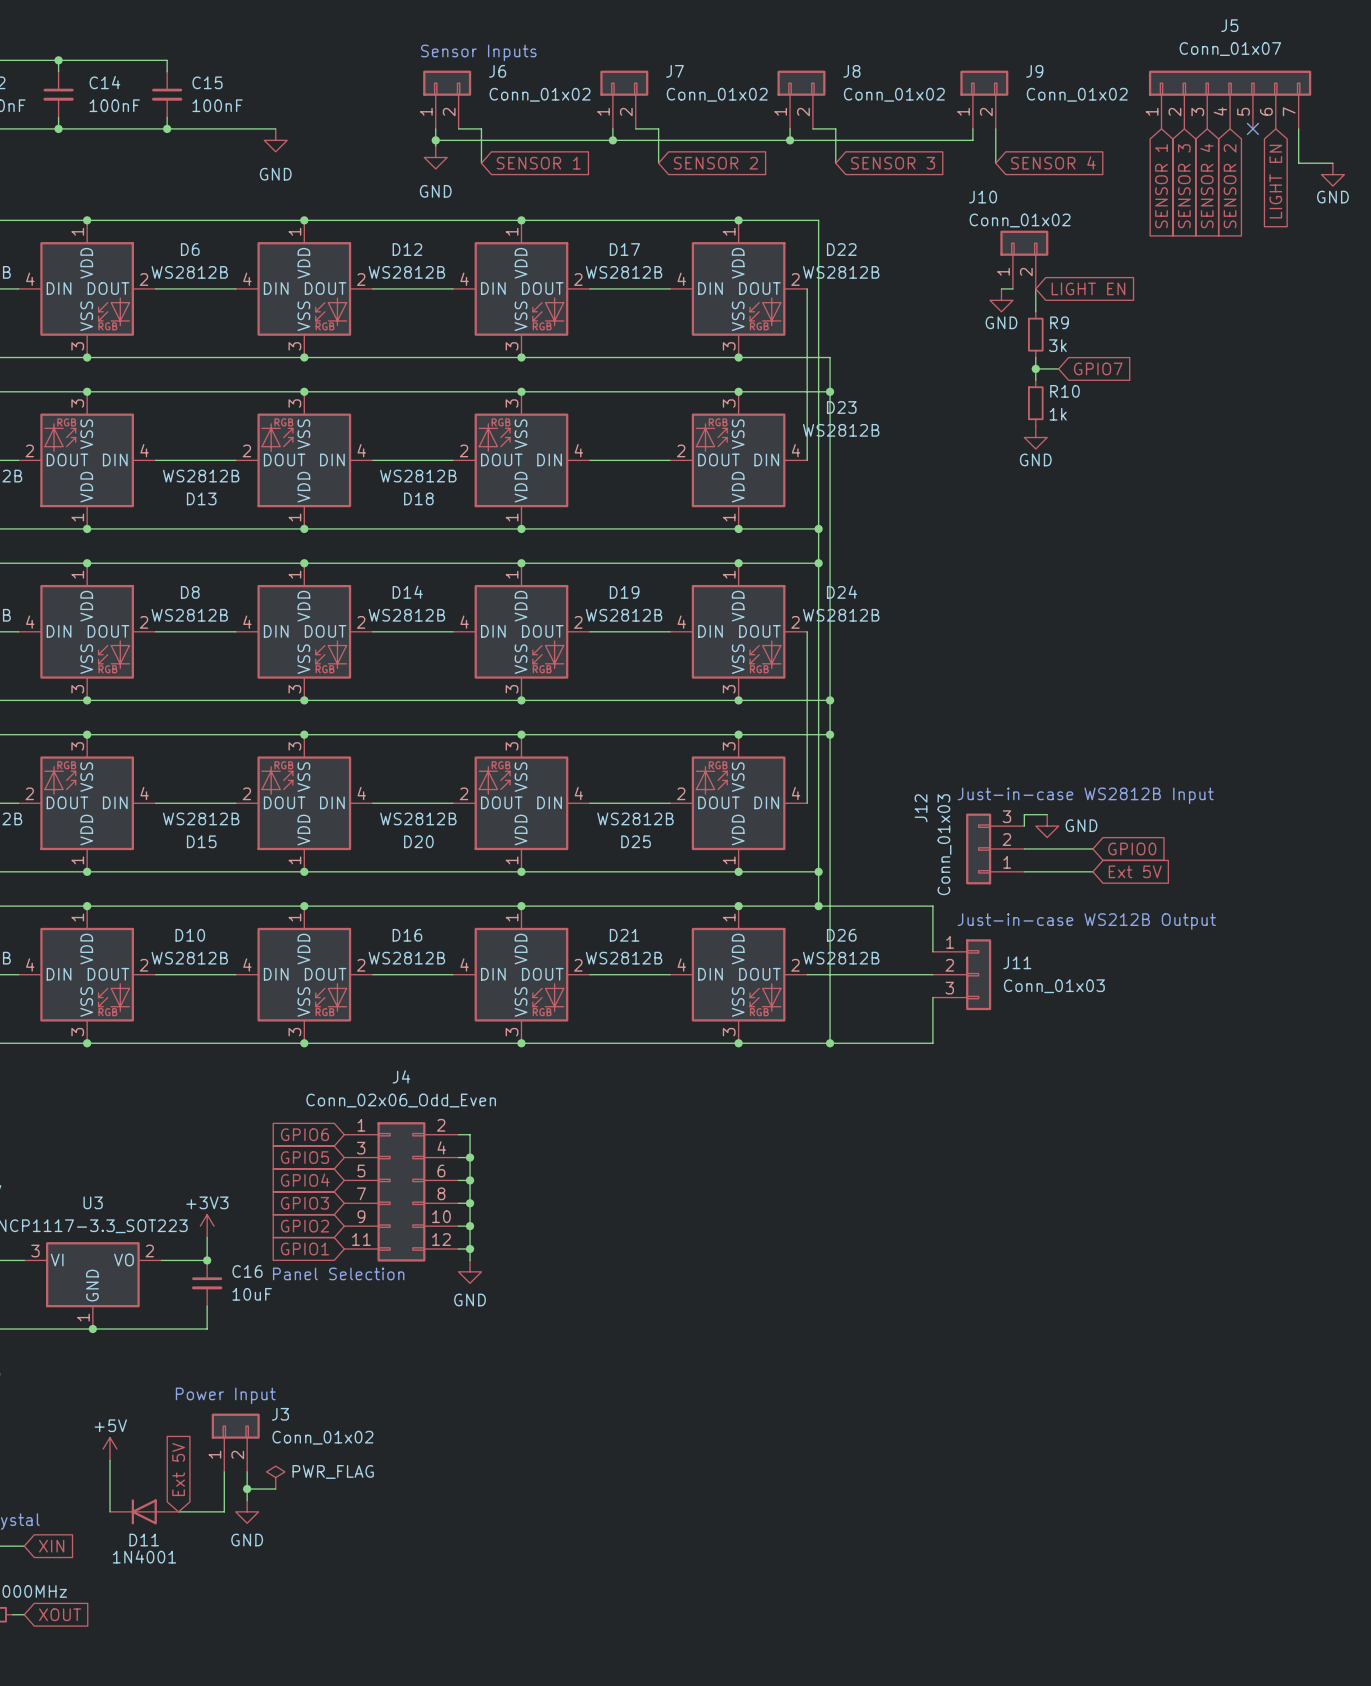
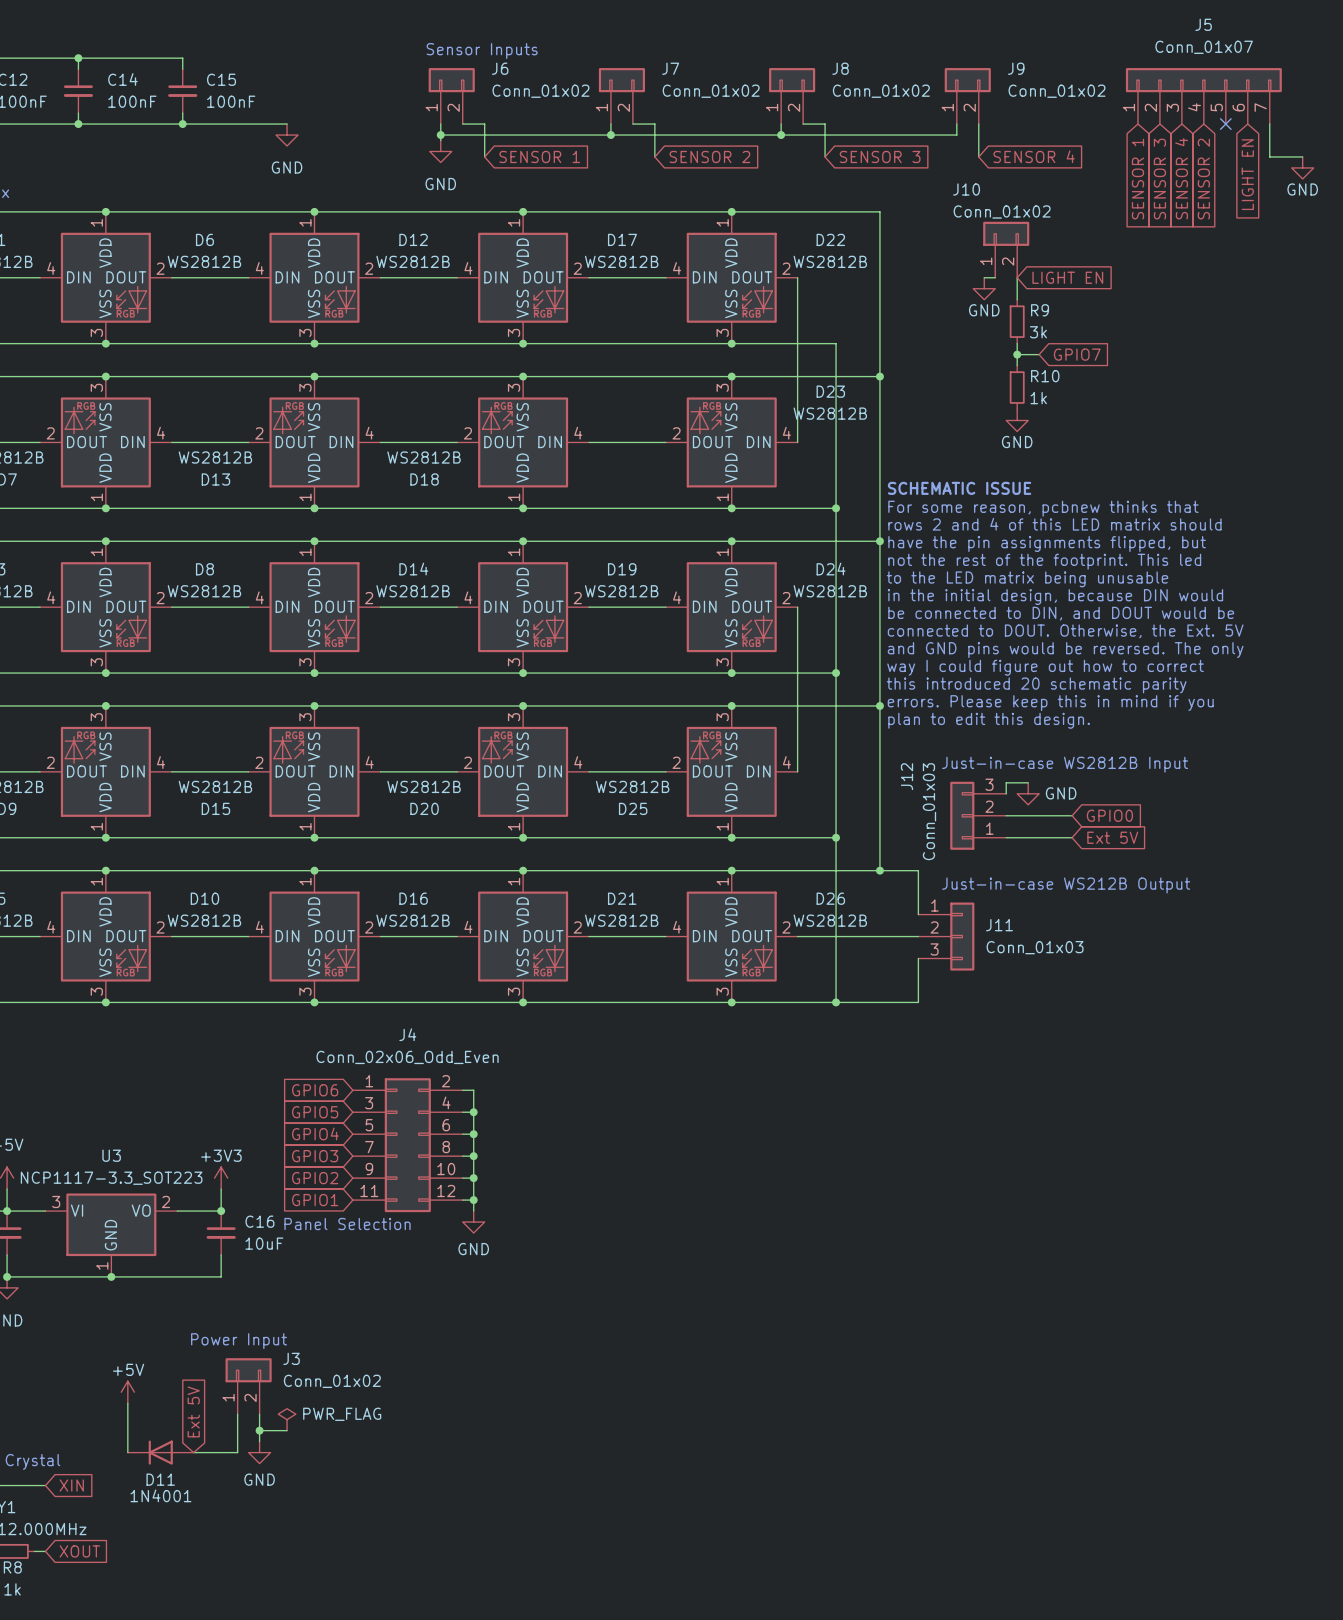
wire: (818, 220) (818, 906) -> (808, 211) (879, 211) (879, 870)
wire: (830, 357) (830, 1043) -> (819, 343) (836, 343) (836, 1002)
wire: none -> (819, 376) (879, 376)
junction: (830, 391) -> none
junction: none -> (879, 376)
text: none -> SCHEMATIC ISSUE (959, 488)
wire: none -> (808, 508) (836, 508)
junction: (818, 528) -> none
junction: none -> (836, 508)
text: none -> For some reason, pcbnew thinks that (1043, 508)
text: none -> rows 2 and 4 of this LED matrix should (1054, 524)
wire: none -> (808, 541) (879, 541)
junction: (818, 563) -> none
junction: none -> (879, 541)
text: none -> have the pin assignments flipped, but (1047, 543)
text: none -> not the rest of the footprint. This led (1044, 561)
text: none -> to the LED matrix being unusable (1027, 579)
text: none -> in the initial design, because DIN would (1055, 597)
text: none -> be connected to DIN, and DOUT would be (1061, 613)
text: none -> connected to DOUT. Otherwise, the Ext. 5V (1065, 631)
text: none -> and GND pins would be reversed. The only (1065, 650)
text: none -> way I could figure out how to correct (1045, 667)
wire: none -> (819, 673) (836, 673)
junction position: (830, 700) -> (836, 673)
text: none -> this introduced 20 schematic parity (1036, 685)
text: none -> errors. Please keep this in mind if you (1050, 703)
wire: none -> (819, 705) (879, 705)
junction: (830, 734) -> none
junction: none -> (879, 705)
text: none -> plan to edit this design. (989, 720)
wire: none -> (808, 837) (836, 837)
junction: (818, 871) -> none
junction: none -> (836, 837)
junction: (818, 906) -> none
junction: none -> (879, 870)
junction position: (830, 1043) -> (836, 1002)

